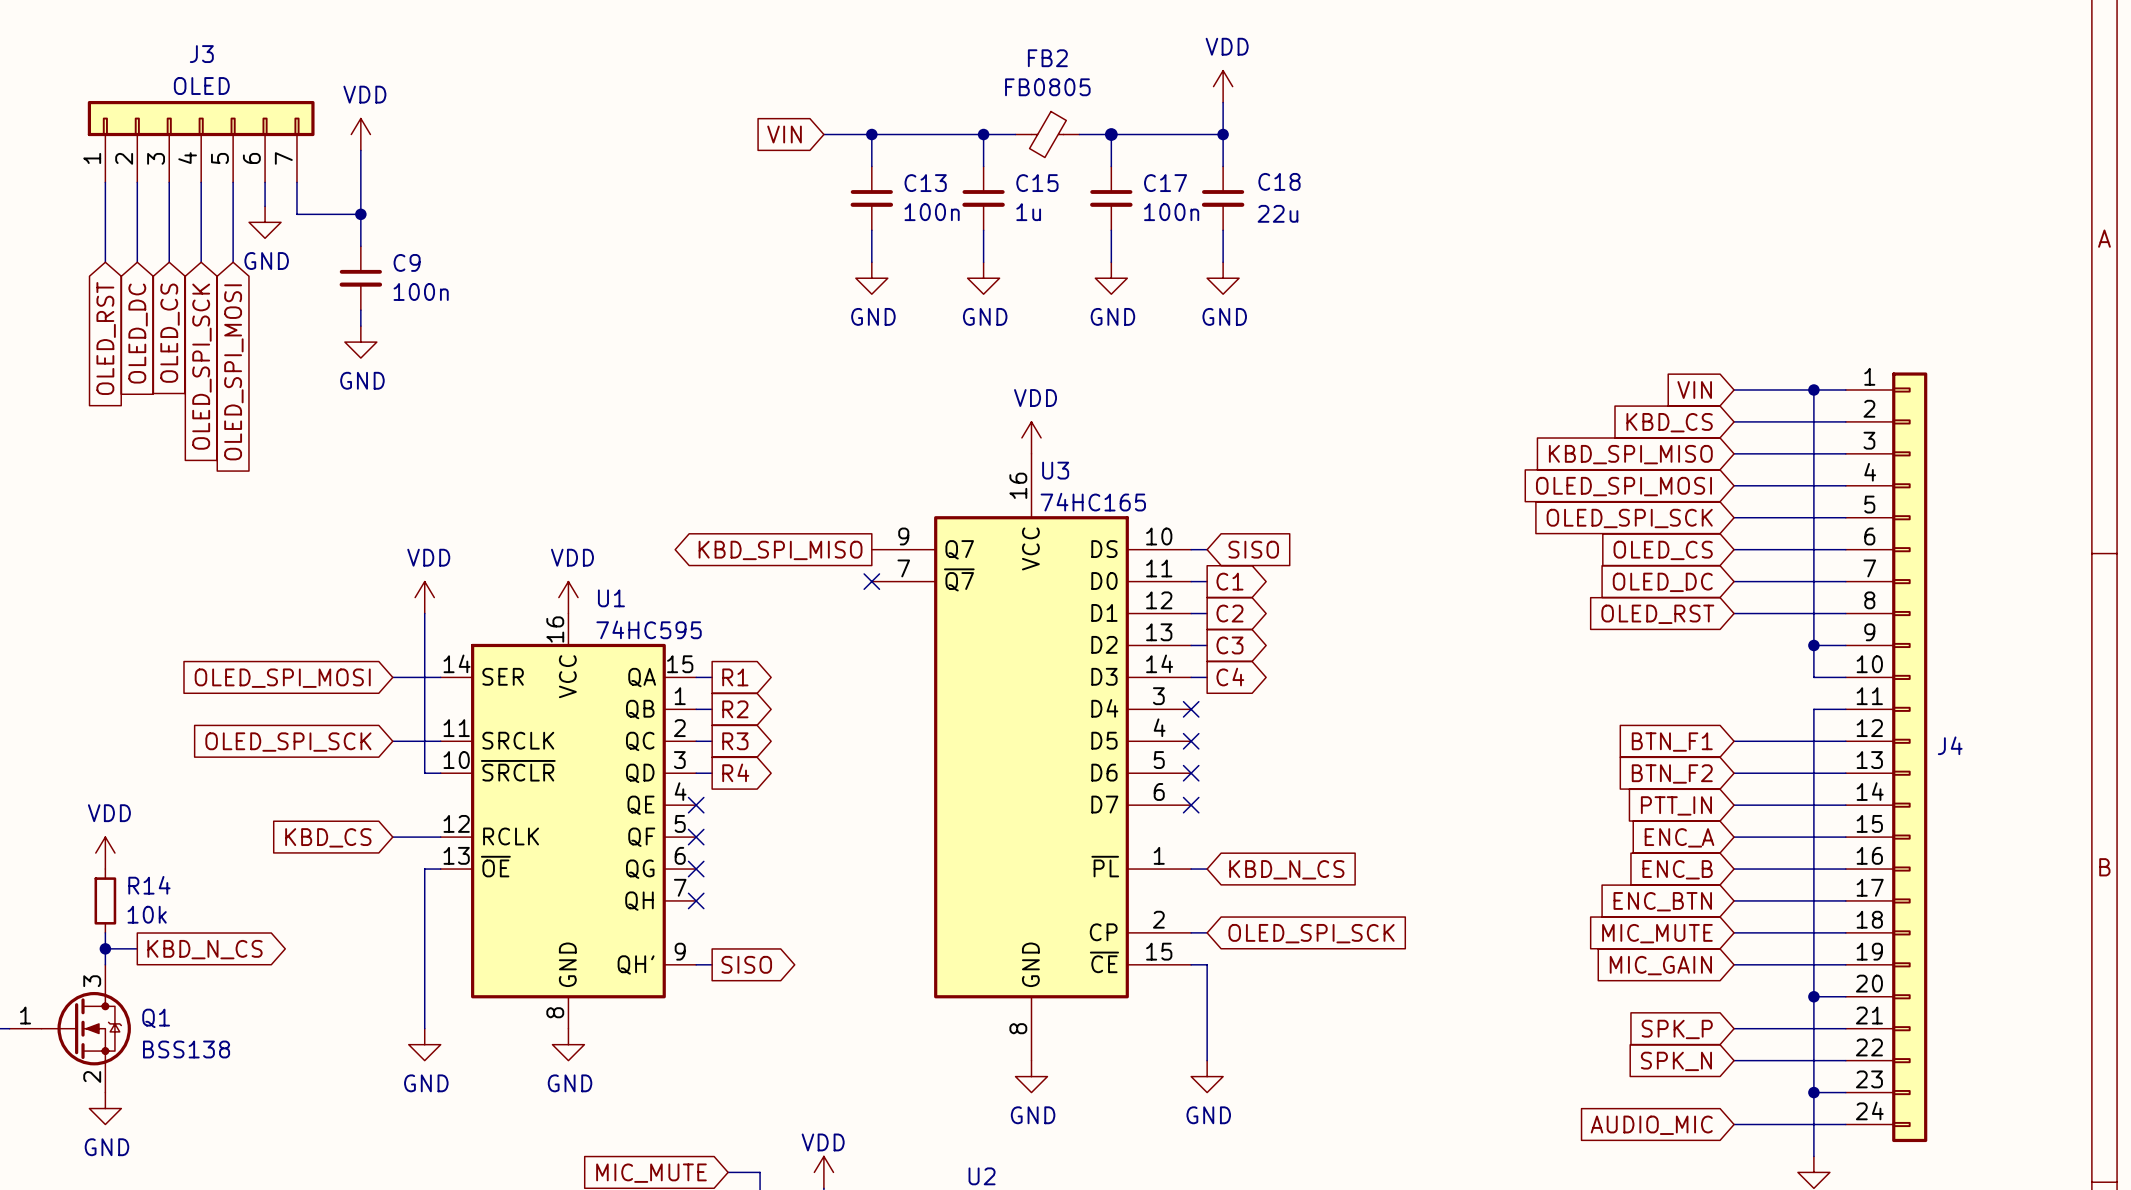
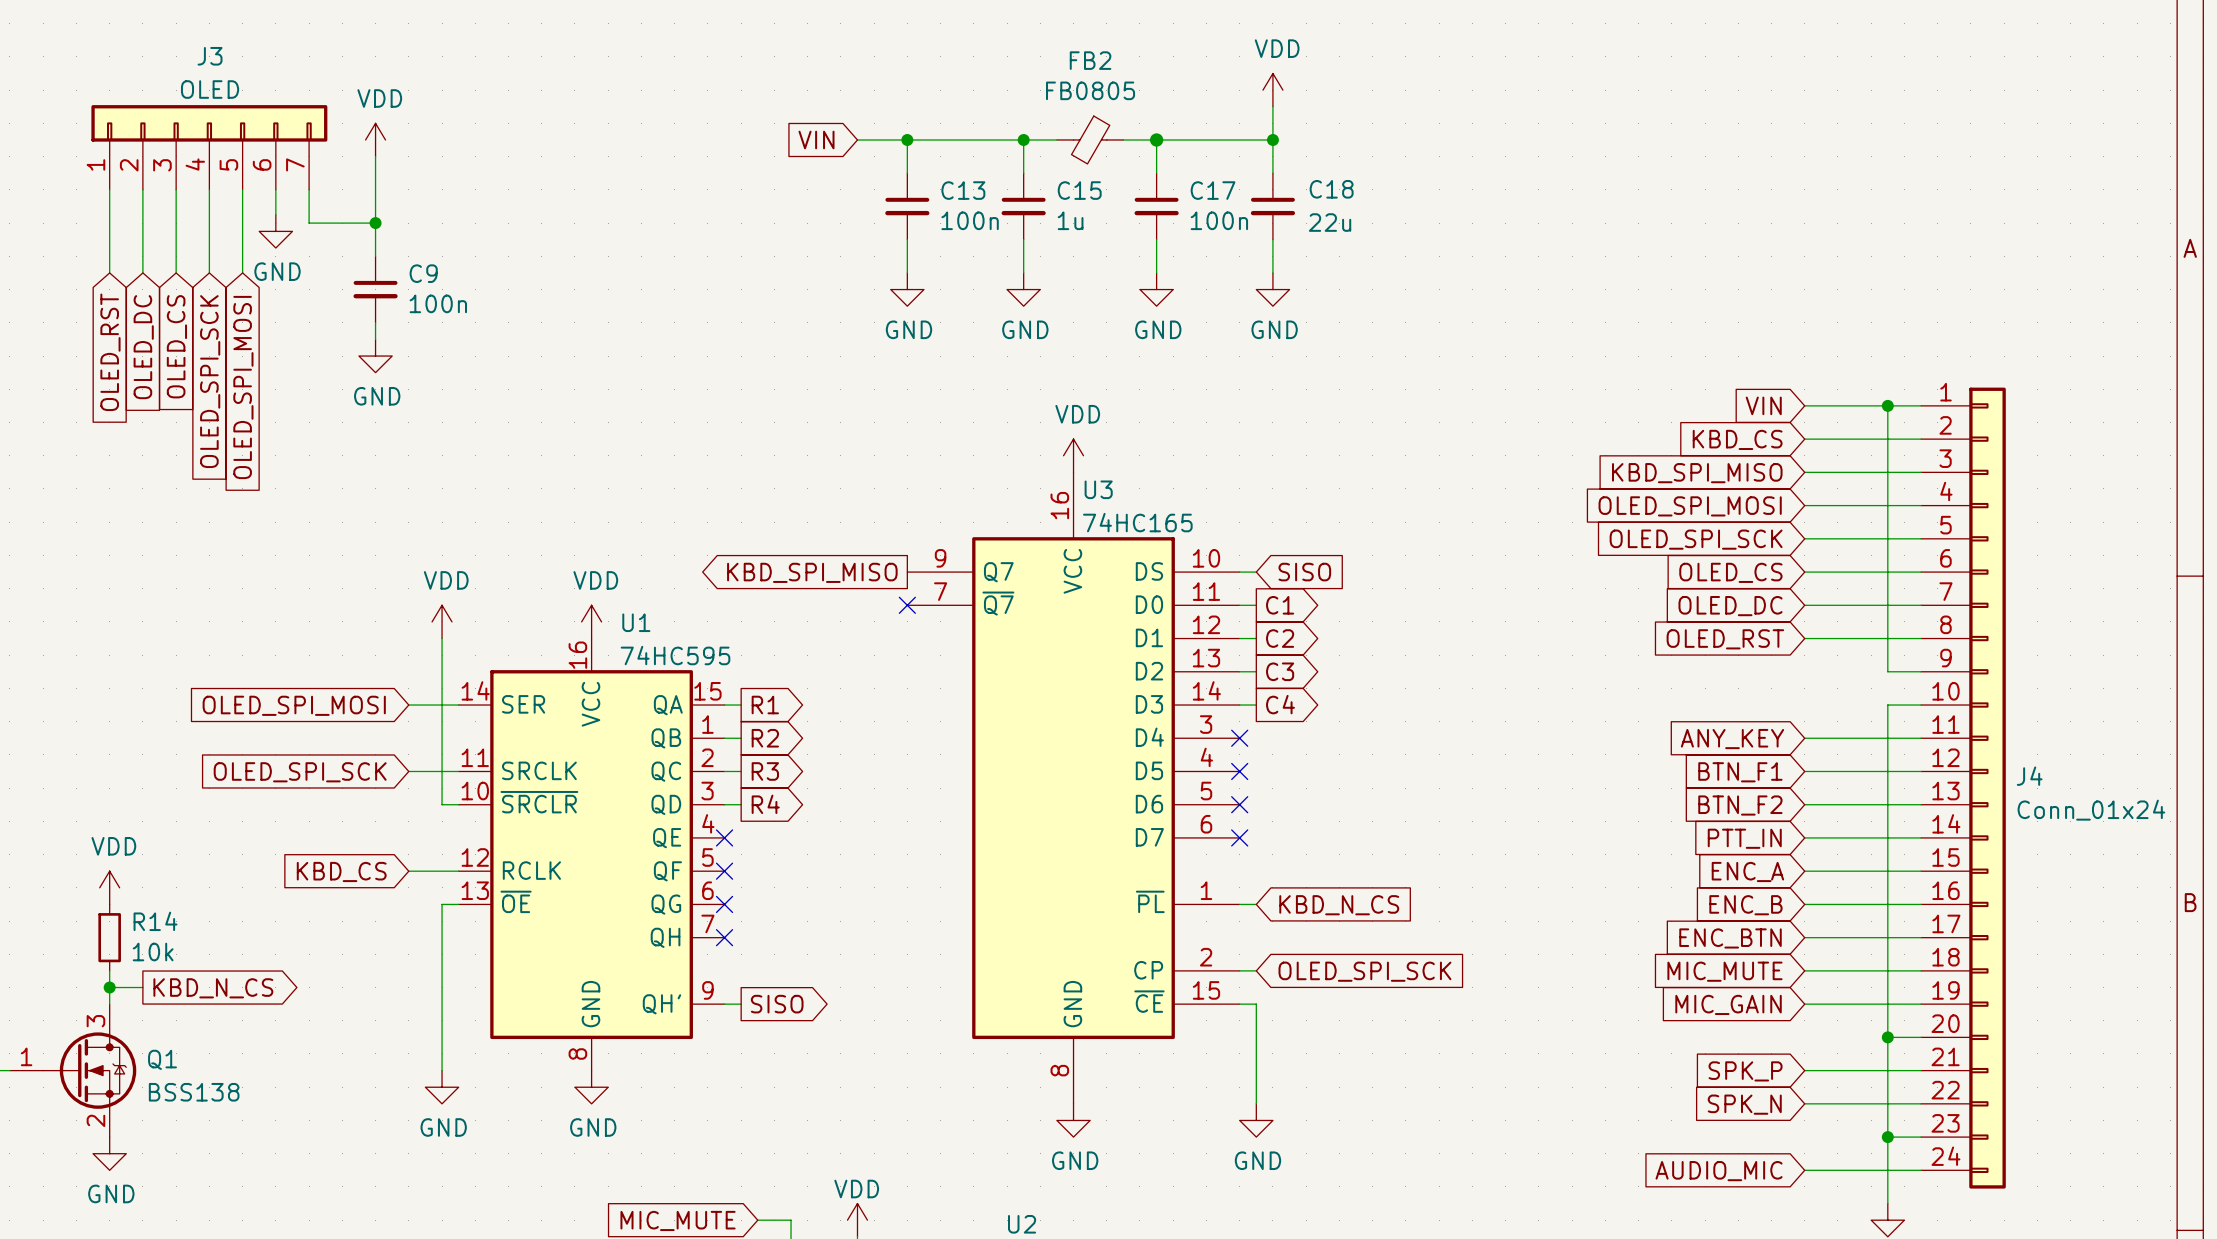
wire: (1813, 645) (1813, 677) -> (1804, 738) (1887, 738) (1887, 705)
junction: (1813, 645) -> none
global label: none -> ANY_KEY (1732, 739)
J4 value: none -> Conn_01x24 (2091, 810)

